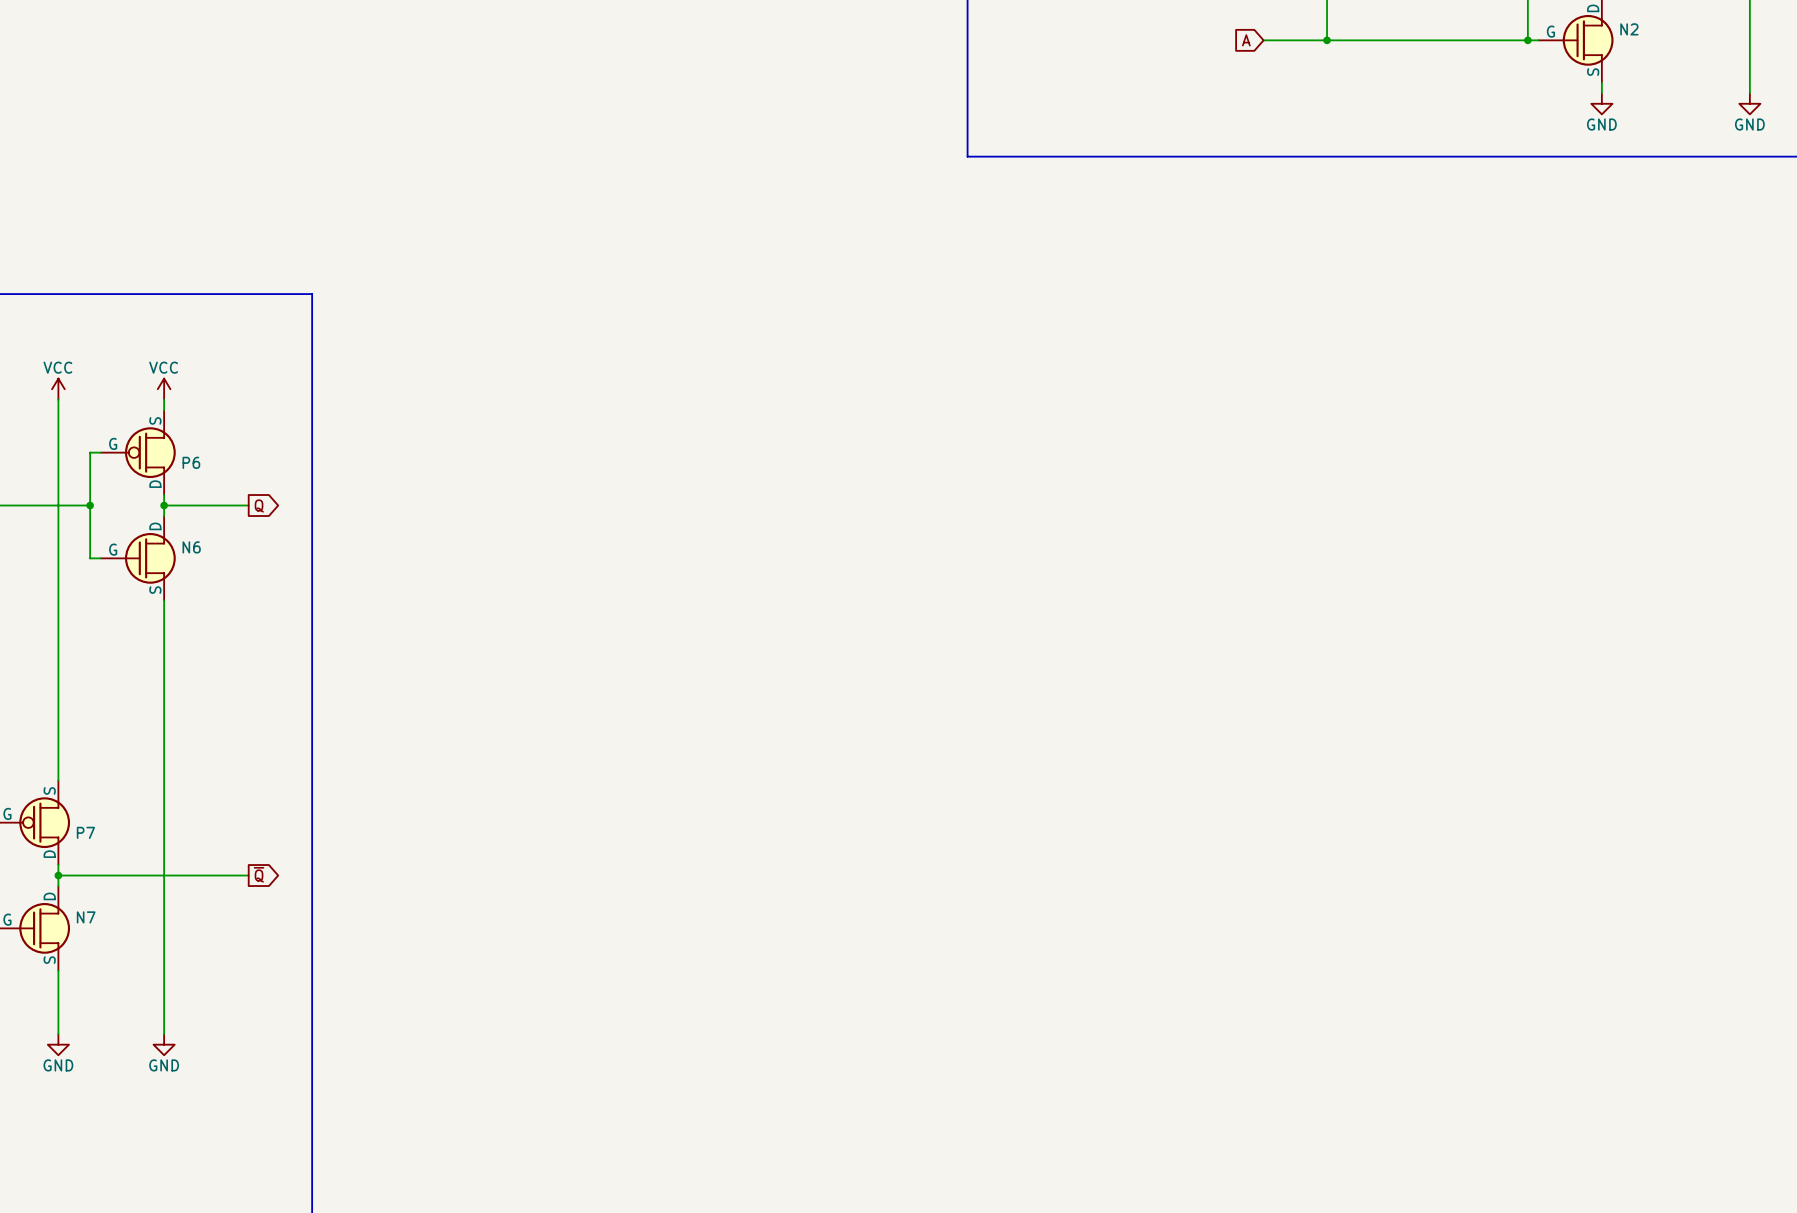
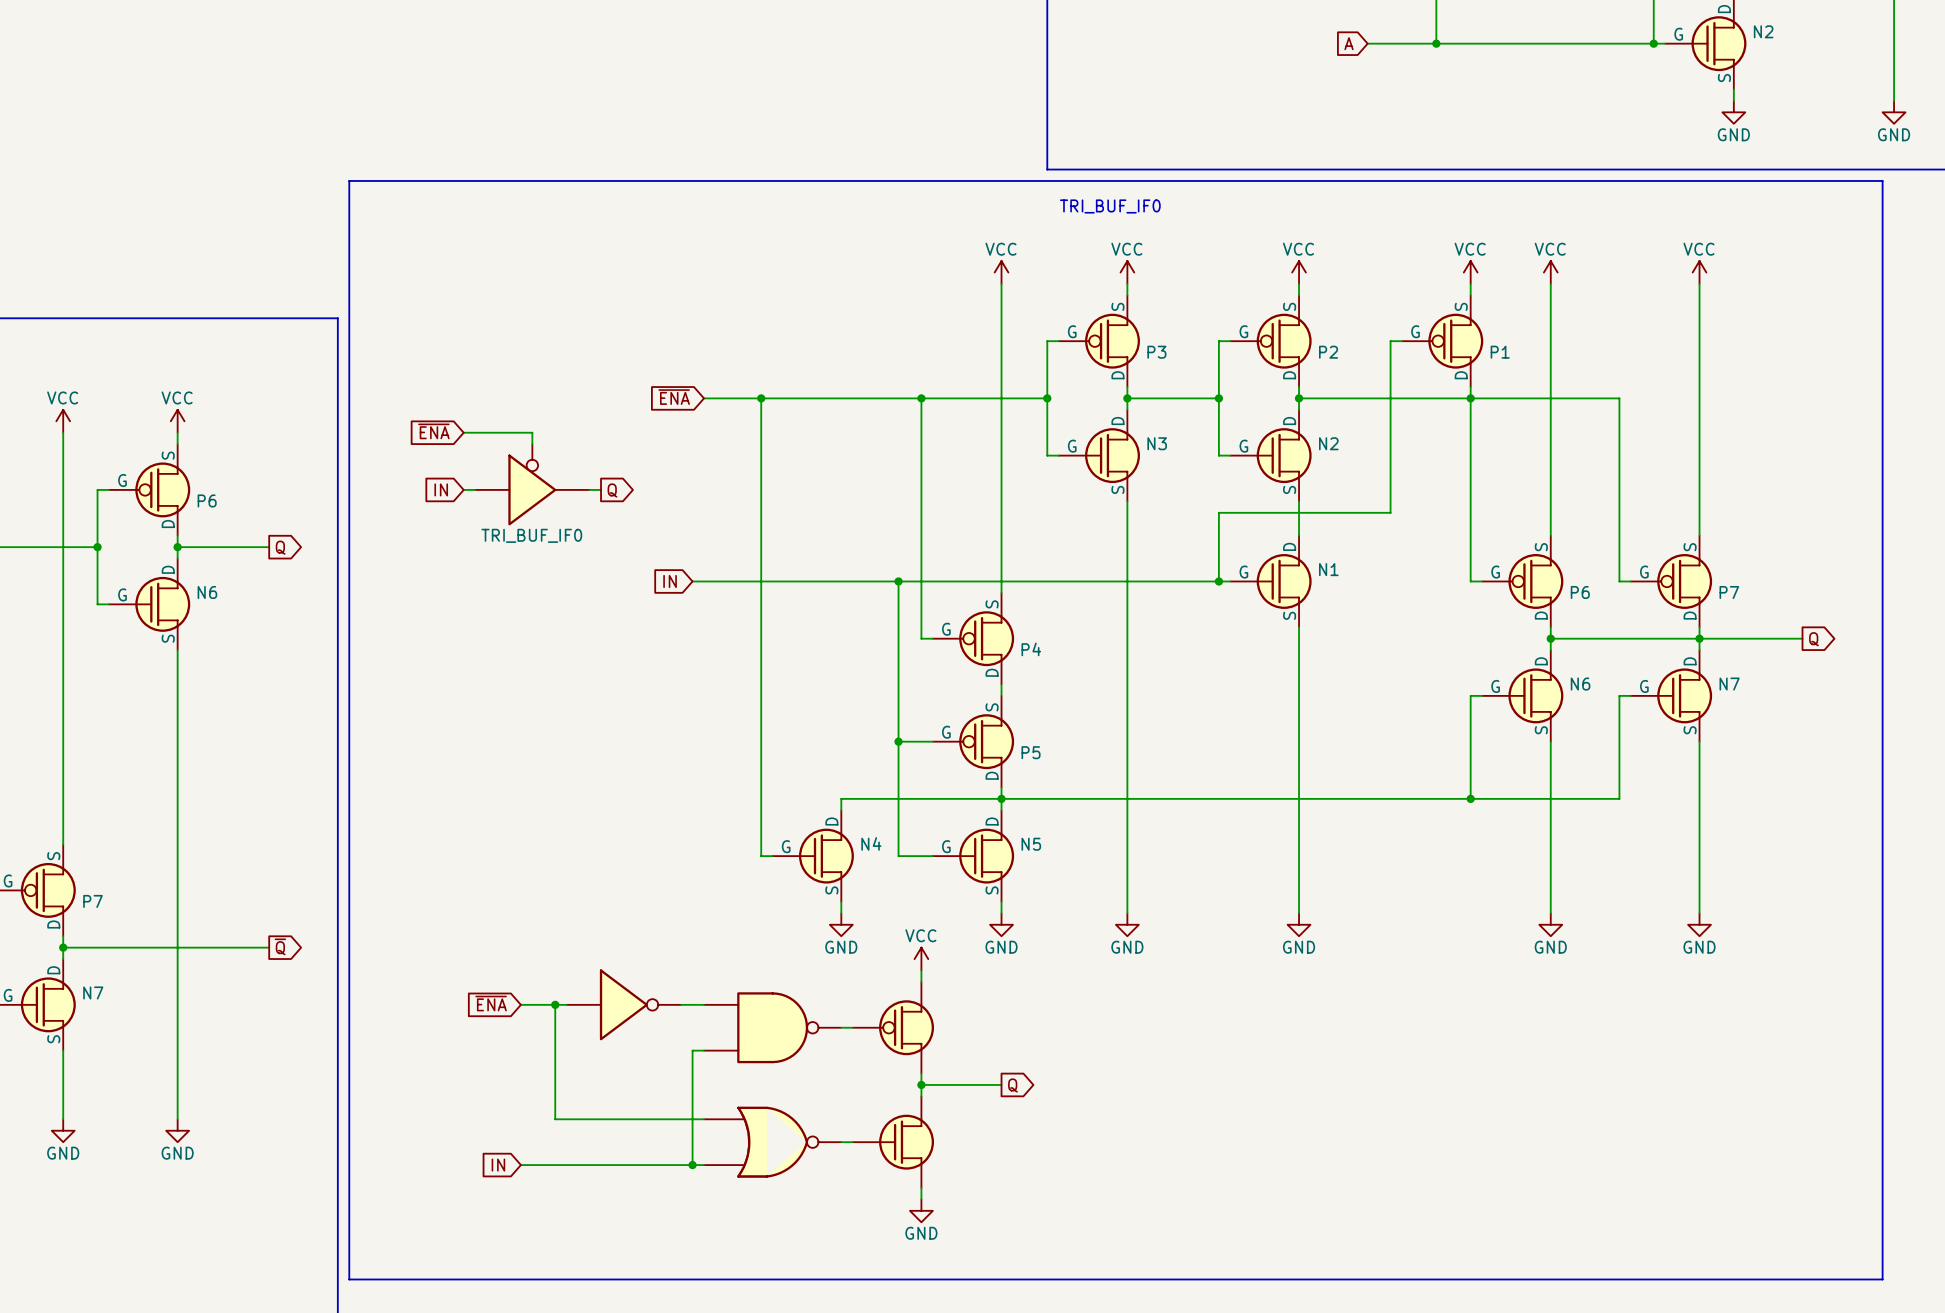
line: none -> (349, 180) (1882, 180) (1882, 1279) (349, 1279) (349, 180)
text: none -> TRI_BUF_IF0 (1110, 206)
power symbol: none -> VCC (1001, 272)
power symbol: none -> VCC (1127, 272)
power symbol: none -> VCC (1299, 272)
power symbol: none -> VCC (1470, 272)
power symbol: none -> VCC (1550, 272)
power symbol: none -> VCC (1699, 272)
wire: none -> (1001, 283) (1001, 592)
wire: none -> (1127, 283) (1127, 295)
wire: none -> (1299, 283) (1299, 295)
wire: none -> (1470, 283) (1470, 295)
wire: none -> (1550, 283) (1550, 535)
wire: none -> (1699, 283) (1699, 535)
wire: none -> (1058, 341) (1047, 341) (1047, 455) (1058, 455)
P3: none -> (1099, 341)
wire: none -> (1230, 341) (1218, 341) (1218, 455) (1230, 455)
P2: none -> (1270, 341)
wire: none -> (1402, 341) (1390, 341) (1390, 512) (1218, 512) (1218, 581)
P1: none -> (1442, 341)
wire: none -> (1127, 386) (1127, 409)
wire: none -> (1299, 386) (1299, 409)
wire: none -> (1470, 386) (1470, 581) (1482, 581)
global label: none -> ~{ENA} (674, 397)
wire: none -> (704, 398) (1047, 398)
wire: none -> (761, 398) (761, 856) (772, 856)
junction: none -> (761, 398)
wire: none -> (921, 398) (921, 638) (932, 638)
junction: none -> (921, 398)
junction: none -> (1047, 398)
wire: none -> (1127, 398) (1218, 398)
junction: none -> (1127, 398)
junction: none -> (1218, 398)
wire: none -> (1299, 398) (1619, 398) (1619, 581) (1630, 581)
junction: none -> (1299, 398)
junction: none -> (1470, 398)
global label: none -> ~{ENA} (433, 431)
wire: none -> (463, 432) (532, 432) (532, 444)
N3: none -> (1099, 455)
N2: none -> (1270, 455)
part: none -> TRI_BUF_IF0 (532, 484)
global label: none -> IN (441, 489)
wire: none -> (463, 489) (475, 489)
wire: none -> (589, 489) (601, 489)
global label: none -> Q (612, 490)
wire: none -> (1127, 501) (1127, 913)
wire: none -> (1299, 501) (1299, 535)
global label: none -> IN (670, 581)
wire: none -> (692, 581) (1230, 581)
wire: none -> (898, 581) (898, 856) (932, 856)
junction: none -> (898, 581)
junction: none -> (1218, 581)
N1: none -> (1270, 581)
P6: none -> (1522, 581)
P7: none -> (1671, 581)
wire: none -> (1299, 627) (1299, 913)
wire: none -> (1550, 627) (1550, 650)
wire: none -> (1699, 627) (1699, 650)
P4: none -> (973, 638)
wire: none -> (1550, 638) (1802, 638)
junction: none -> (1550, 638)
junction: none -> (1699, 638)
global label: none -> Q (1813, 639)
wire: none -> (1001, 684) (1001, 695)
wire: none -> (1482, 695) (1470, 695) (1470, 798)
N6: none -> (1522, 695)
wire: none -> (1630, 695) (1619, 695) (1619, 798) (841, 798) (841, 810)
N7: none -> (1671, 695)
wire: none -> (898, 741) (932, 741)
junction: none -> (898, 741)
P5: none -> (973, 741)
wire: none -> (1550, 741) (1550, 913)
wire: none -> (1699, 741) (1699, 913)
wire: none -> (1001, 787) (1001, 810)
junction: none -> (1001, 798)
junction: none -> (1470, 798)
N4: none -> (813, 856)
N5: none -> (973, 856)
wire: none -> (841, 901) (841, 913)
wire: none -> (1001, 901) (1001, 913)
power symbol: none -> GND (841, 924)
power symbol: none -> GND (1001, 924)
power symbol: none -> GND (1127, 924)
power symbol: none -> GND (1299, 924)
power symbol: none -> GND (1550, 924)
power symbol: none -> GND (1699, 924)
power symbol: none -> VCC (921, 959)
wire: none -> (921, 970) (921, 981)
global label: none -> ~{ENA} (491, 1003)
wire: none -> (520, 1004) (566, 1004)
wire: none -> (555, 1004) (555, 1119) (704, 1119)
junction: none -> (555, 1004)
part: none -> (623, 1004)
wire: none -> (681, 1004) (704, 1004)
part: none -> (772, 1027)
wire: none -> (841, 1027) (852, 1027)
part: none -> (893, 1027)
wire: none -> (704, 1050) (692, 1050) (692, 1165)
wire: none -> (921, 1073) (921, 1096)
wire: none -> (921, 1084) (1001, 1084)
junction: none -> (921, 1084)
global label: none -> Q (1012, 1085)
part: none -> (772, 1142)
wire: none -> (841, 1142) (852, 1142)
part: none -> (893, 1142)
global label: none -> IN (498, 1165)
wire: none -> (520, 1165) (704, 1165)
junction: none -> (692, 1165)
wire: none -> (921, 1187) (921, 1199)
power symbol: none -> GND (921, 1210)

